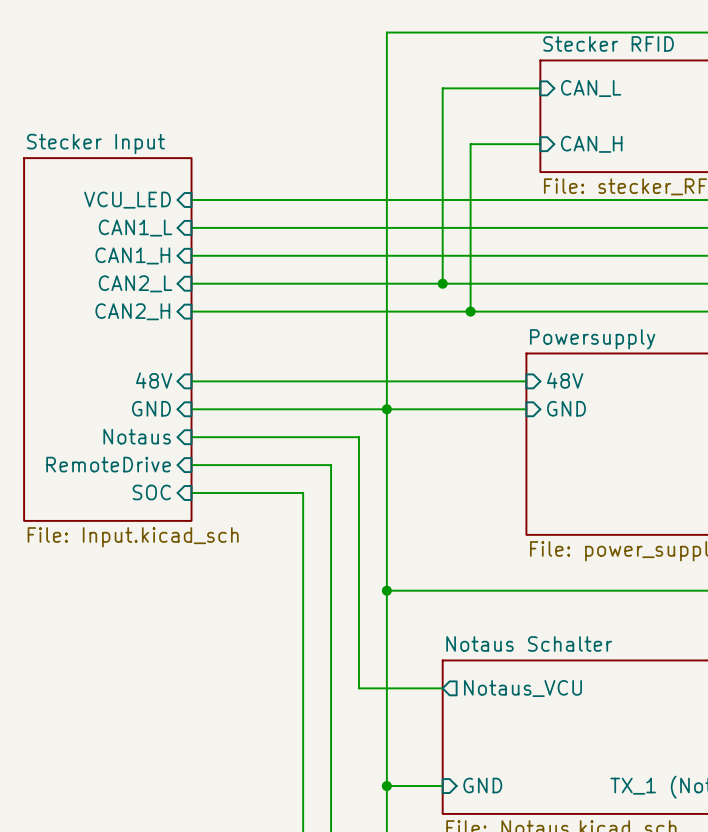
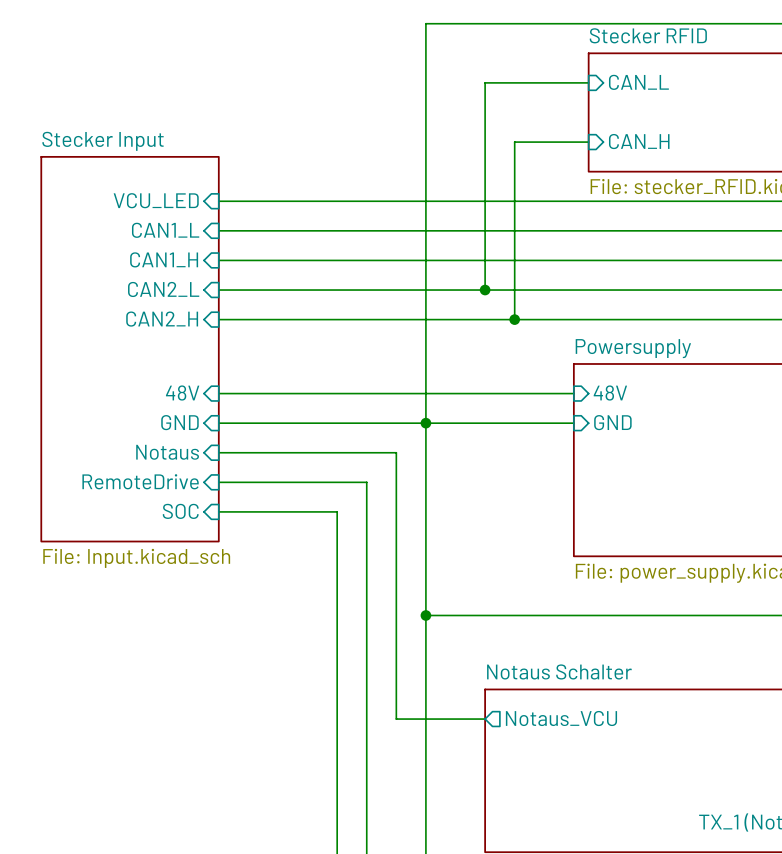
sheet pin: GND (482, 785) -> none
wire: (386, 786) (442, 786) -> none
junction: (386, 786) -> none

